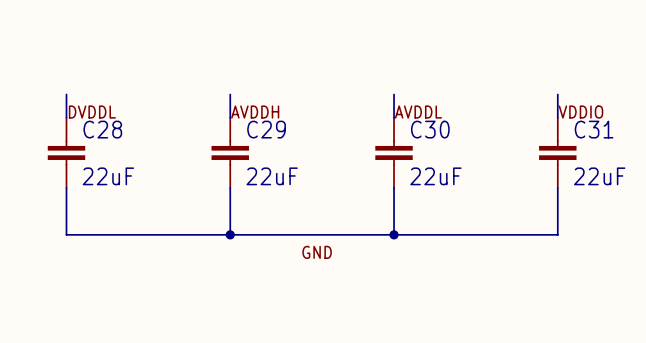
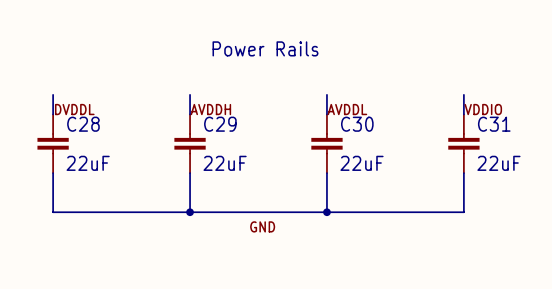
text: none -> Power Rails (265, 48)

